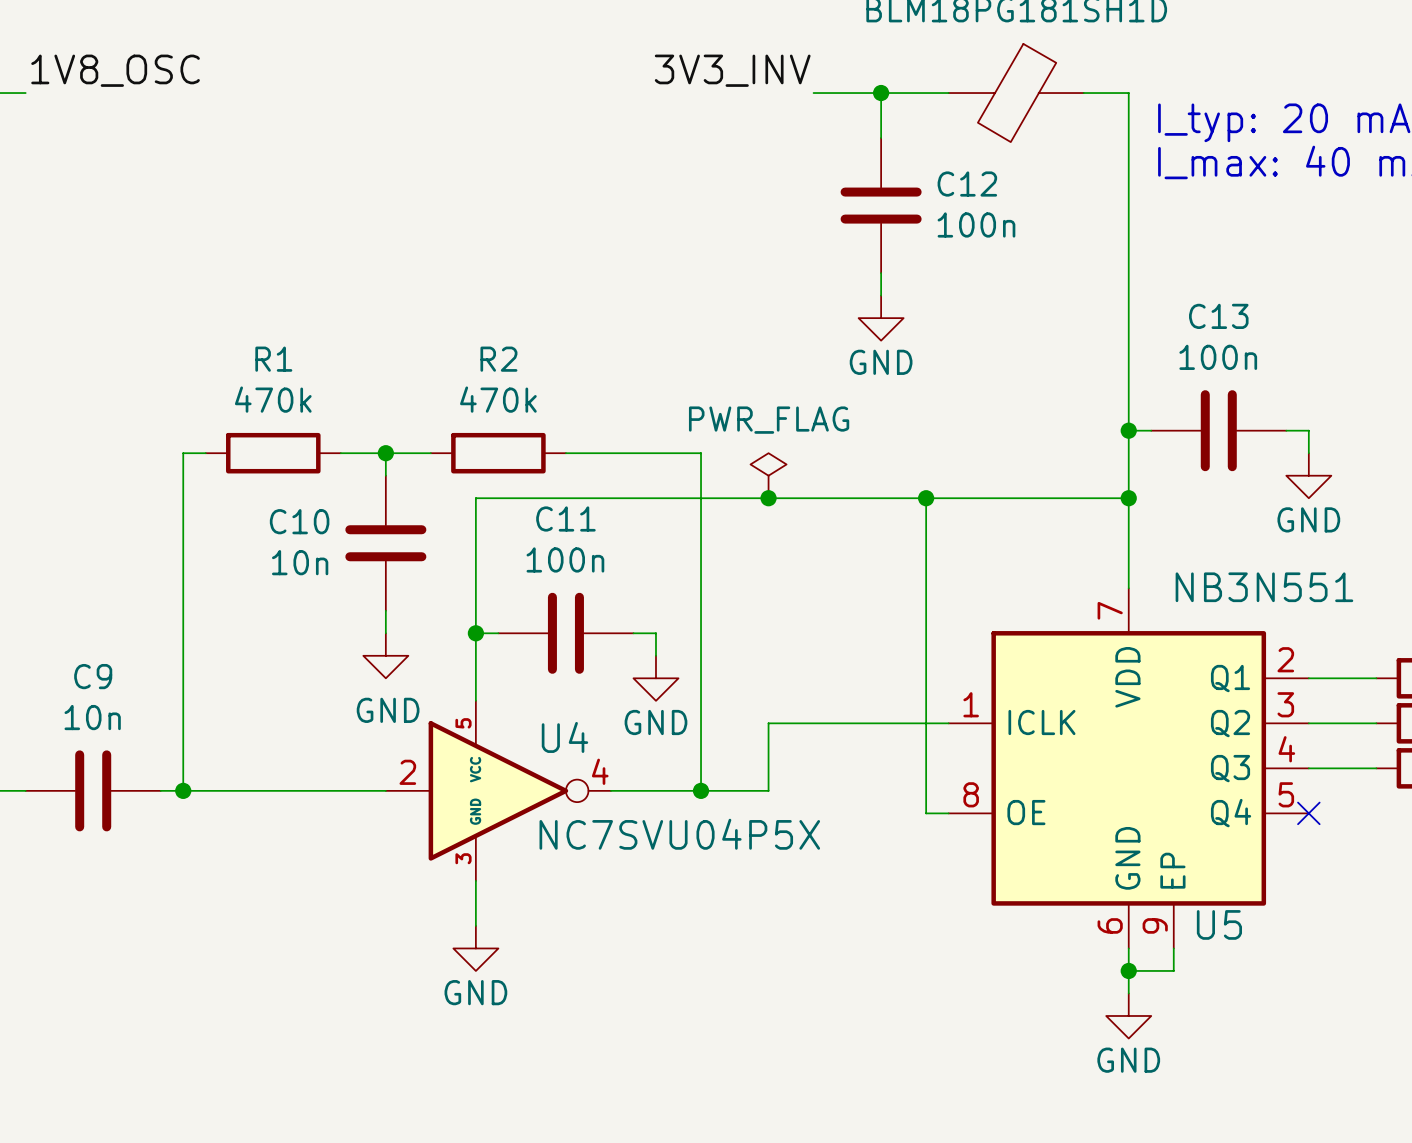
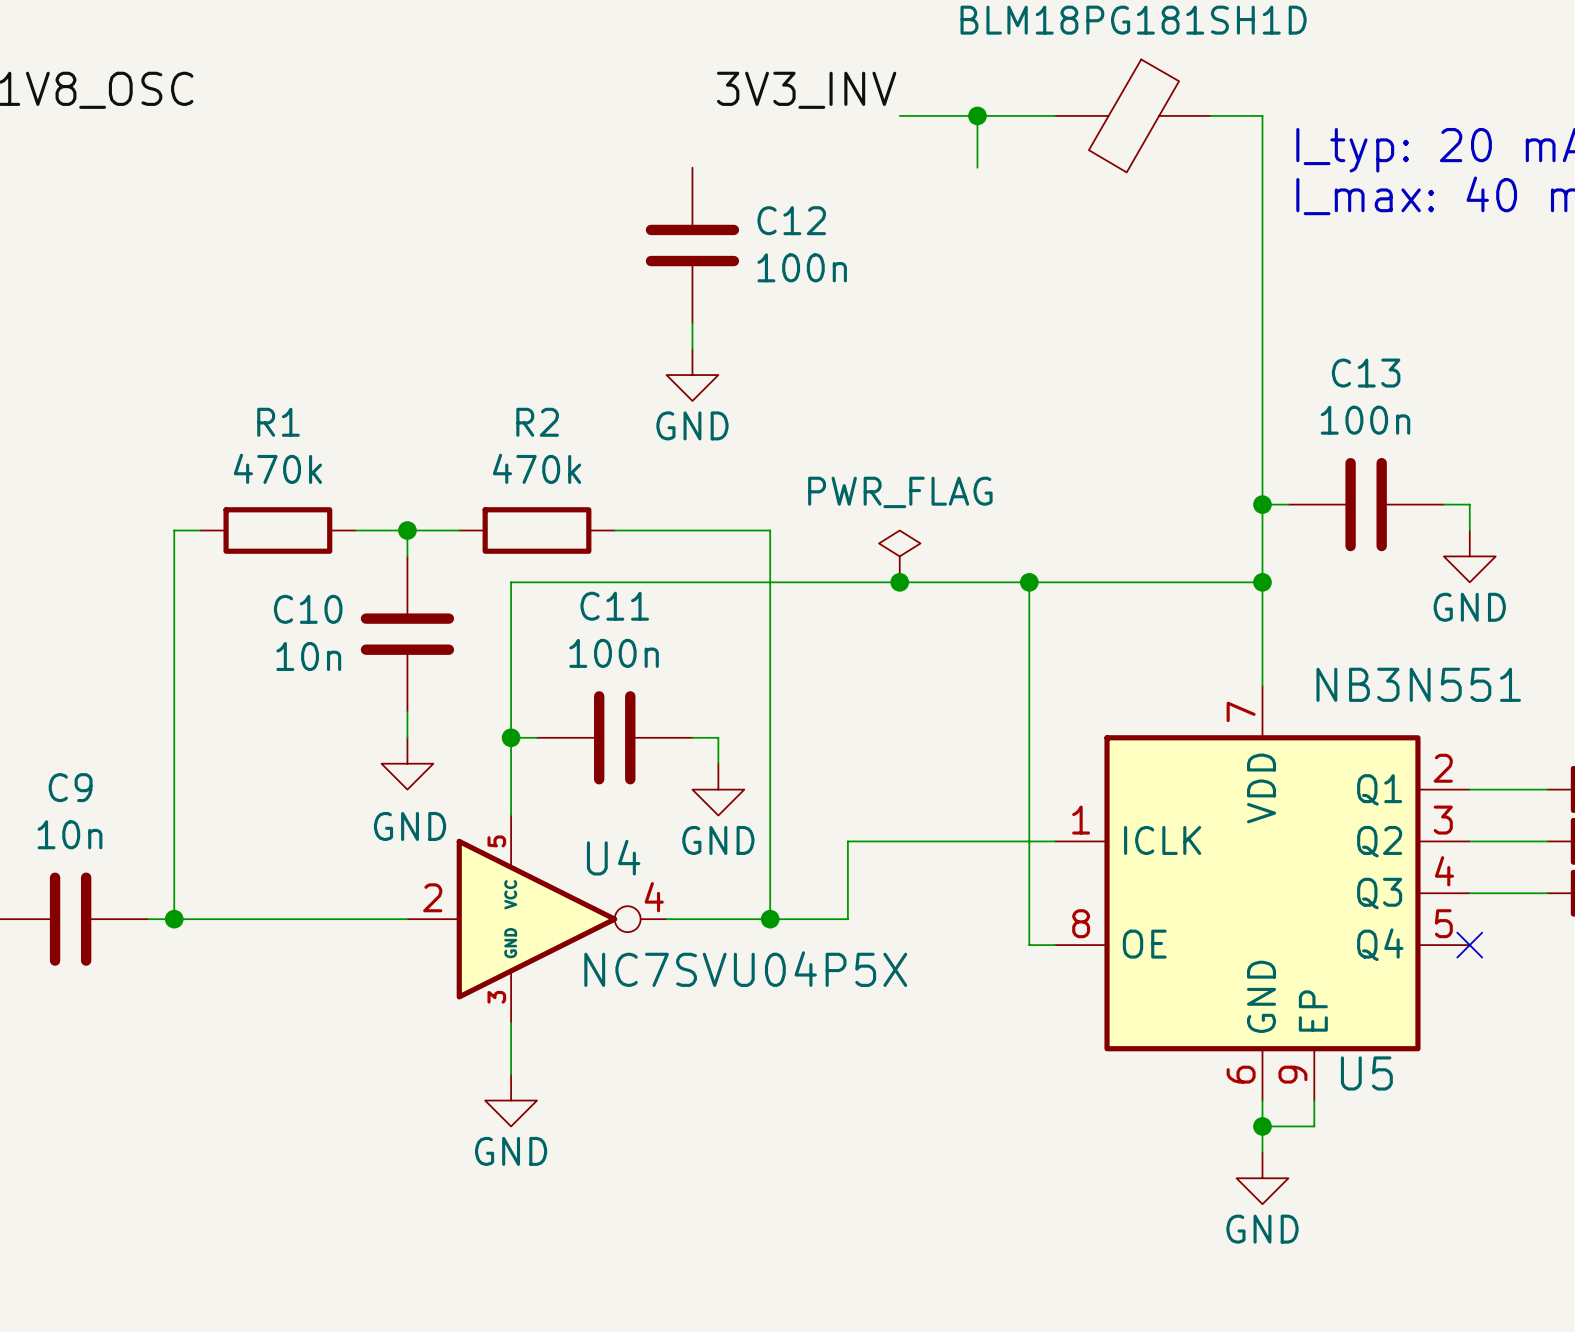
C12 position: (881, 205) -> (692, 245)
wire: (881, 273) (881, 295) -> (692, 323) (692, 349)
power symbol position: GND (881, 318) -> GND (692, 375)
power symbol position: PWR_FLAG (768, 475) -> PWR_FLAG (899, 556)
junction position: (768, 498) -> (899, 582)

